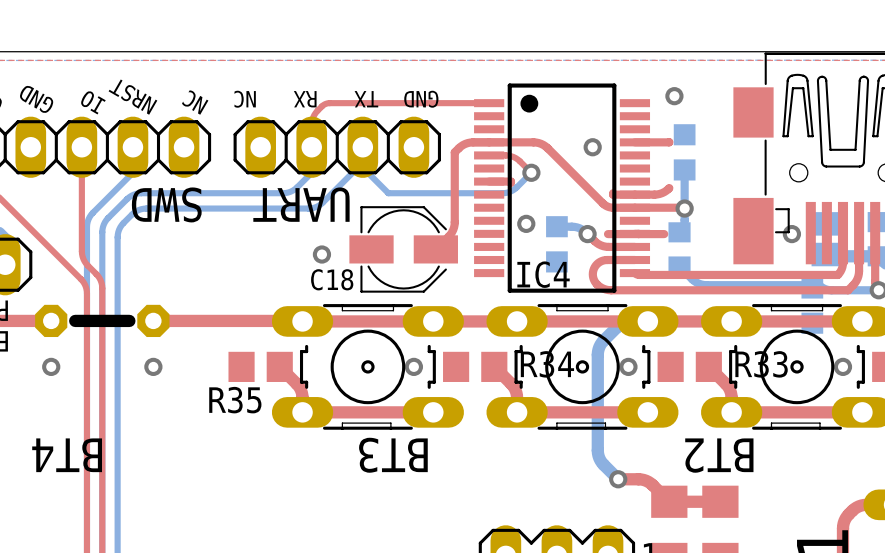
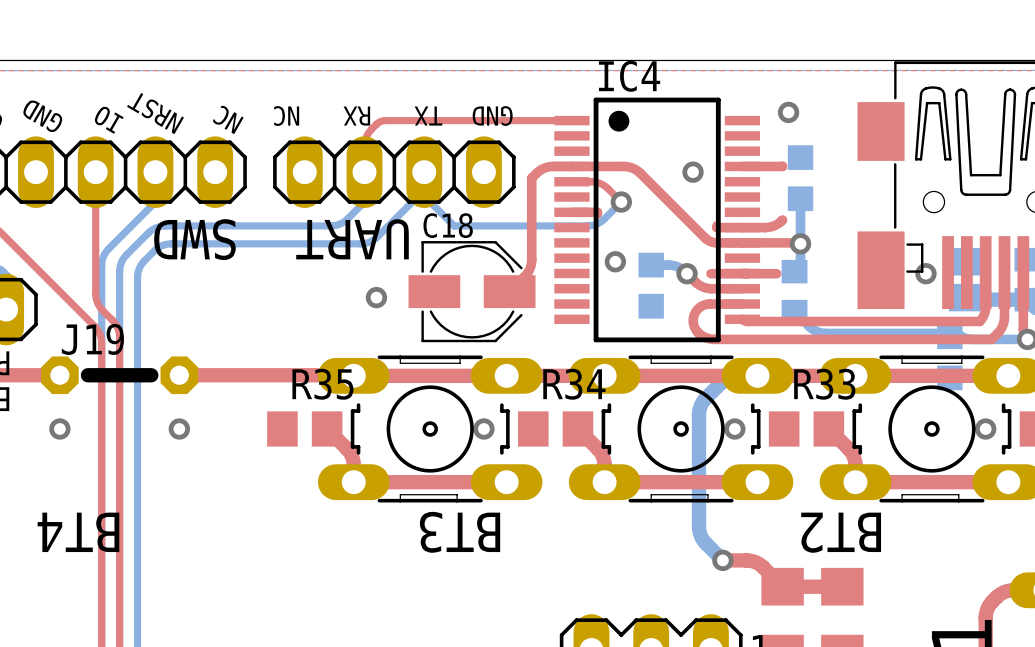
IC4 name position: IC4 (543, 274) -> IC4 (629, 76)
C18 name position: C18 (332, 279) -> C18 (448, 225)
J19 name: none -> J19 (92, 339)
R34 name position: R34 (547, 364) -> R34 (574, 384)
R33 name position: R33 (761, 364) -> R33 (824, 384)
R35 name position: R35 (235, 400) -> R35 (322, 384)

